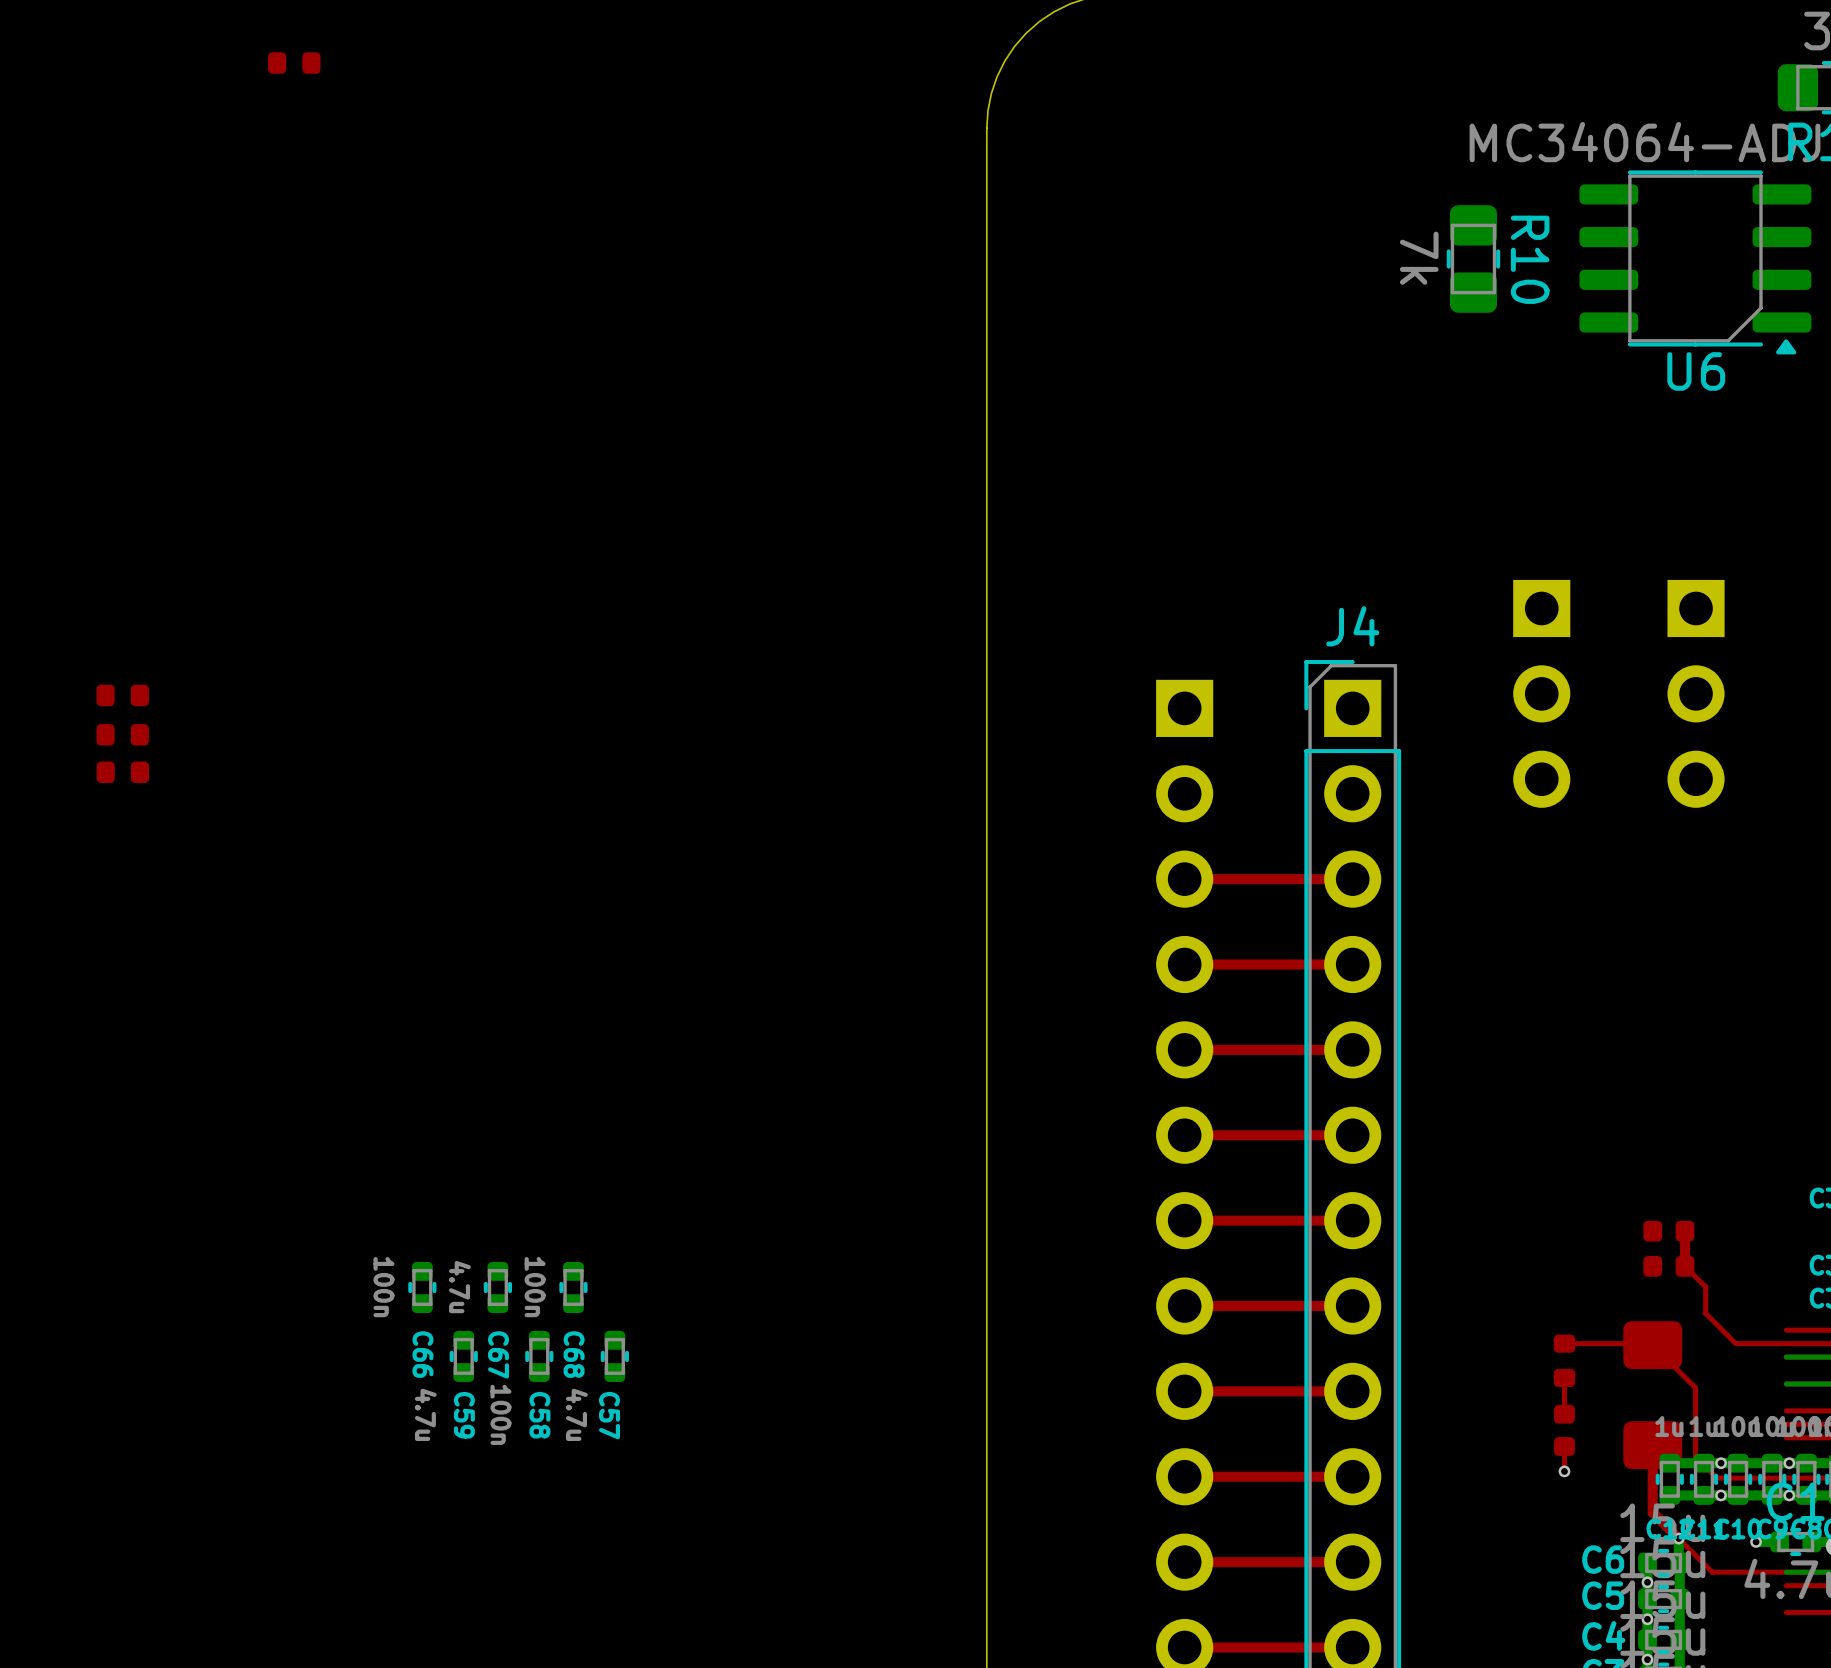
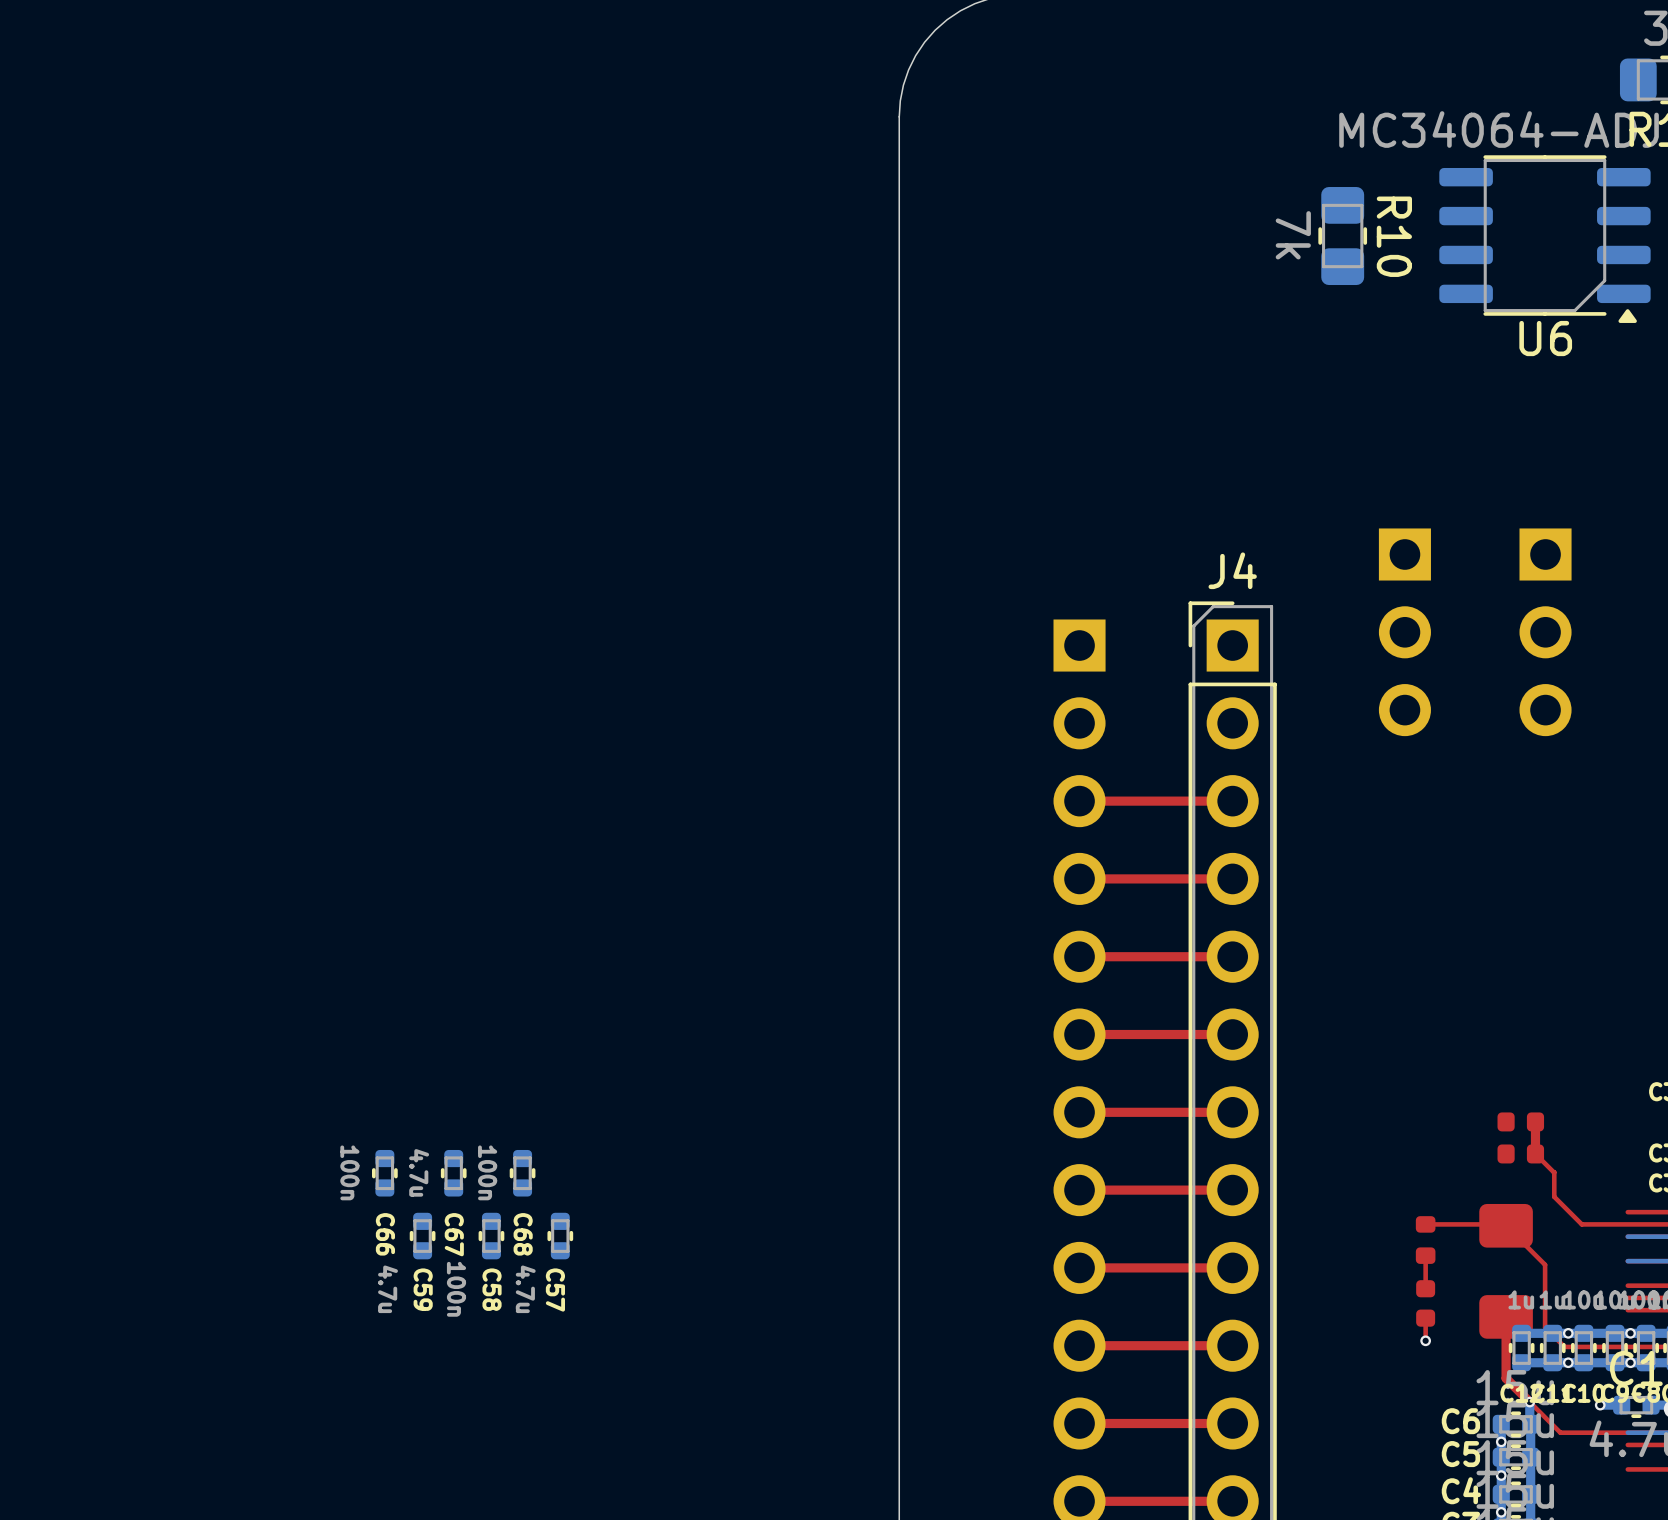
part: (294, 63) -> none
part: (122, 695) -> none
part: (122, 734) -> none
part: (122, 772) -> none

